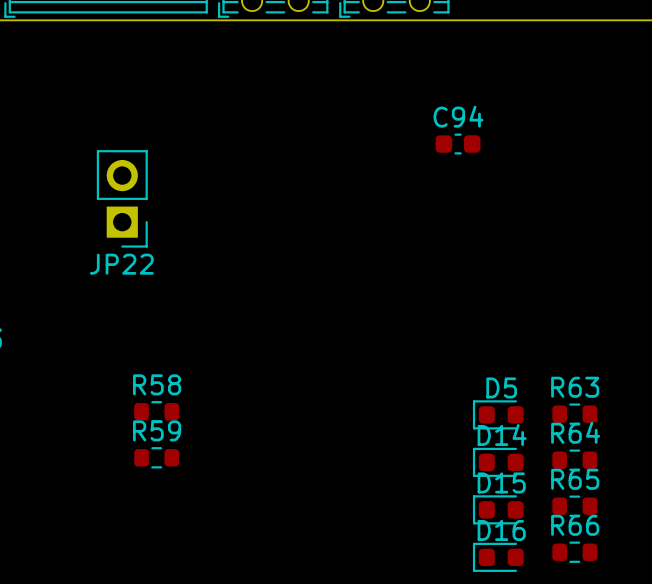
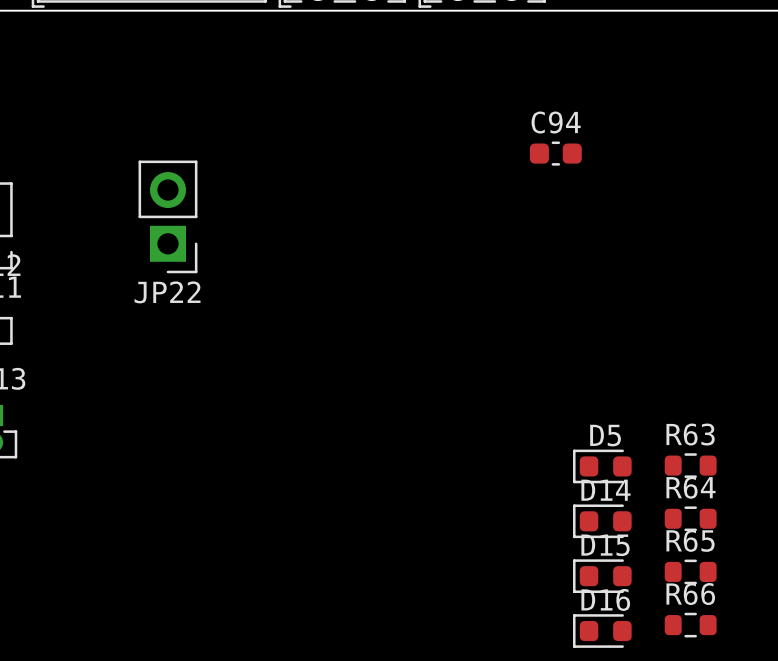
R58: (156, 411) -> none
R59: (156, 457) -> none

